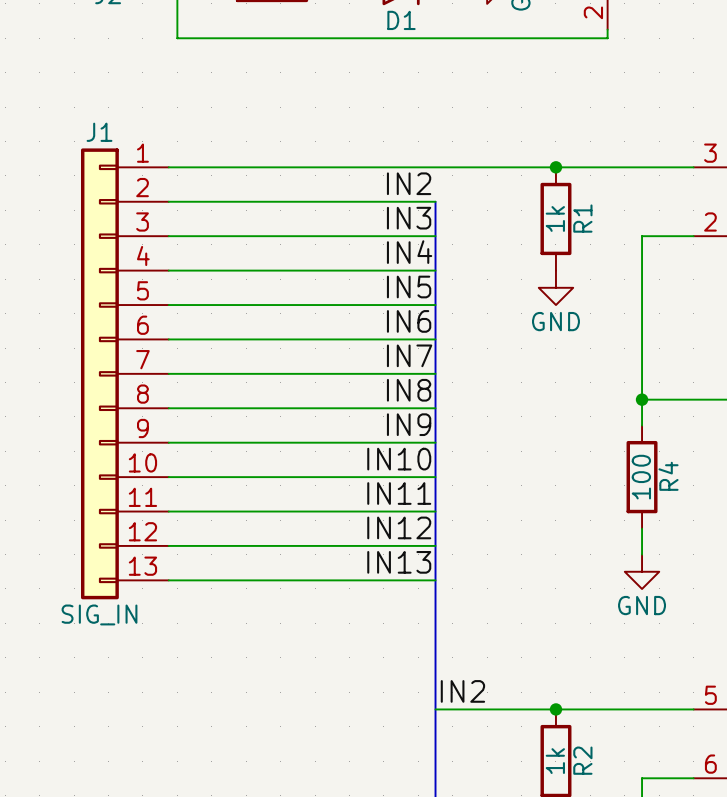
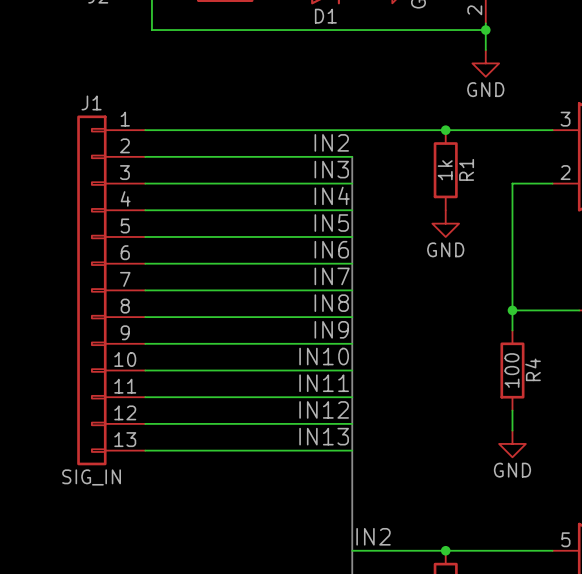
wire: none -> (485, 30) (485, 50)
junction: none -> (485, 30)
power symbol: none -> GND (485, 63)

